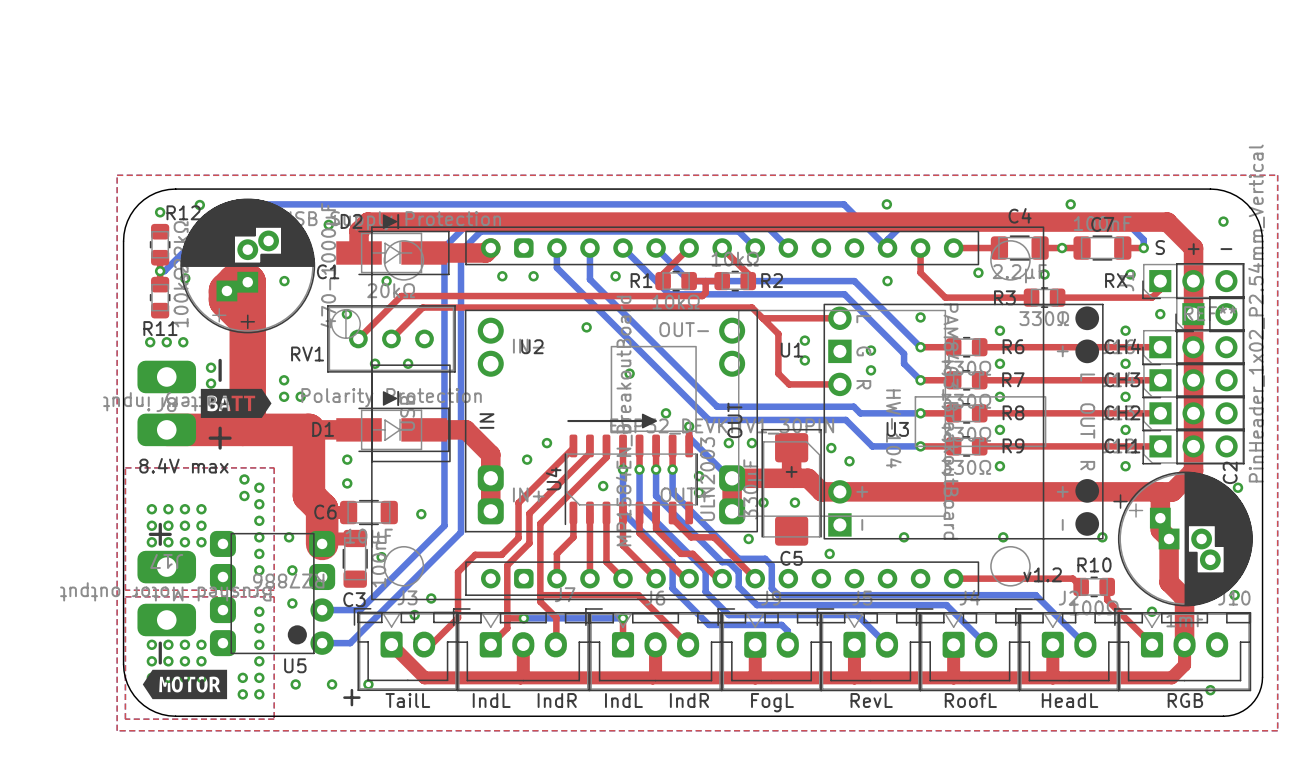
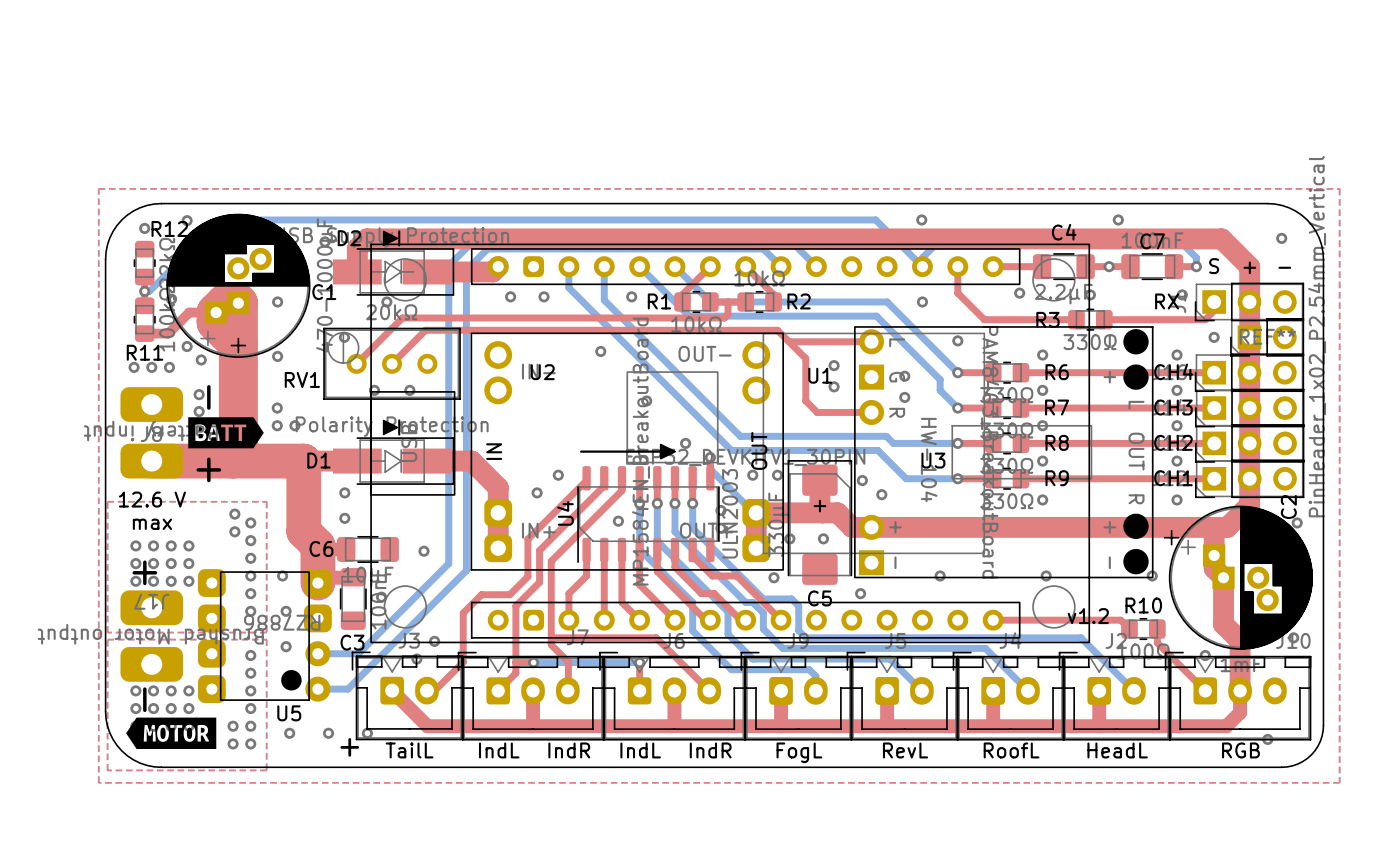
top track: none -> (216, 312) (189, 312) (168, 333) (144, 333)
via: none -> (187, 346)
via: none -> (277, 356)
via: none -> (201, 359)
text: none -> 12.6 V (152, 499)
text: 8.4V max (183, 465) -> none
text: none -> max (152, 524)

